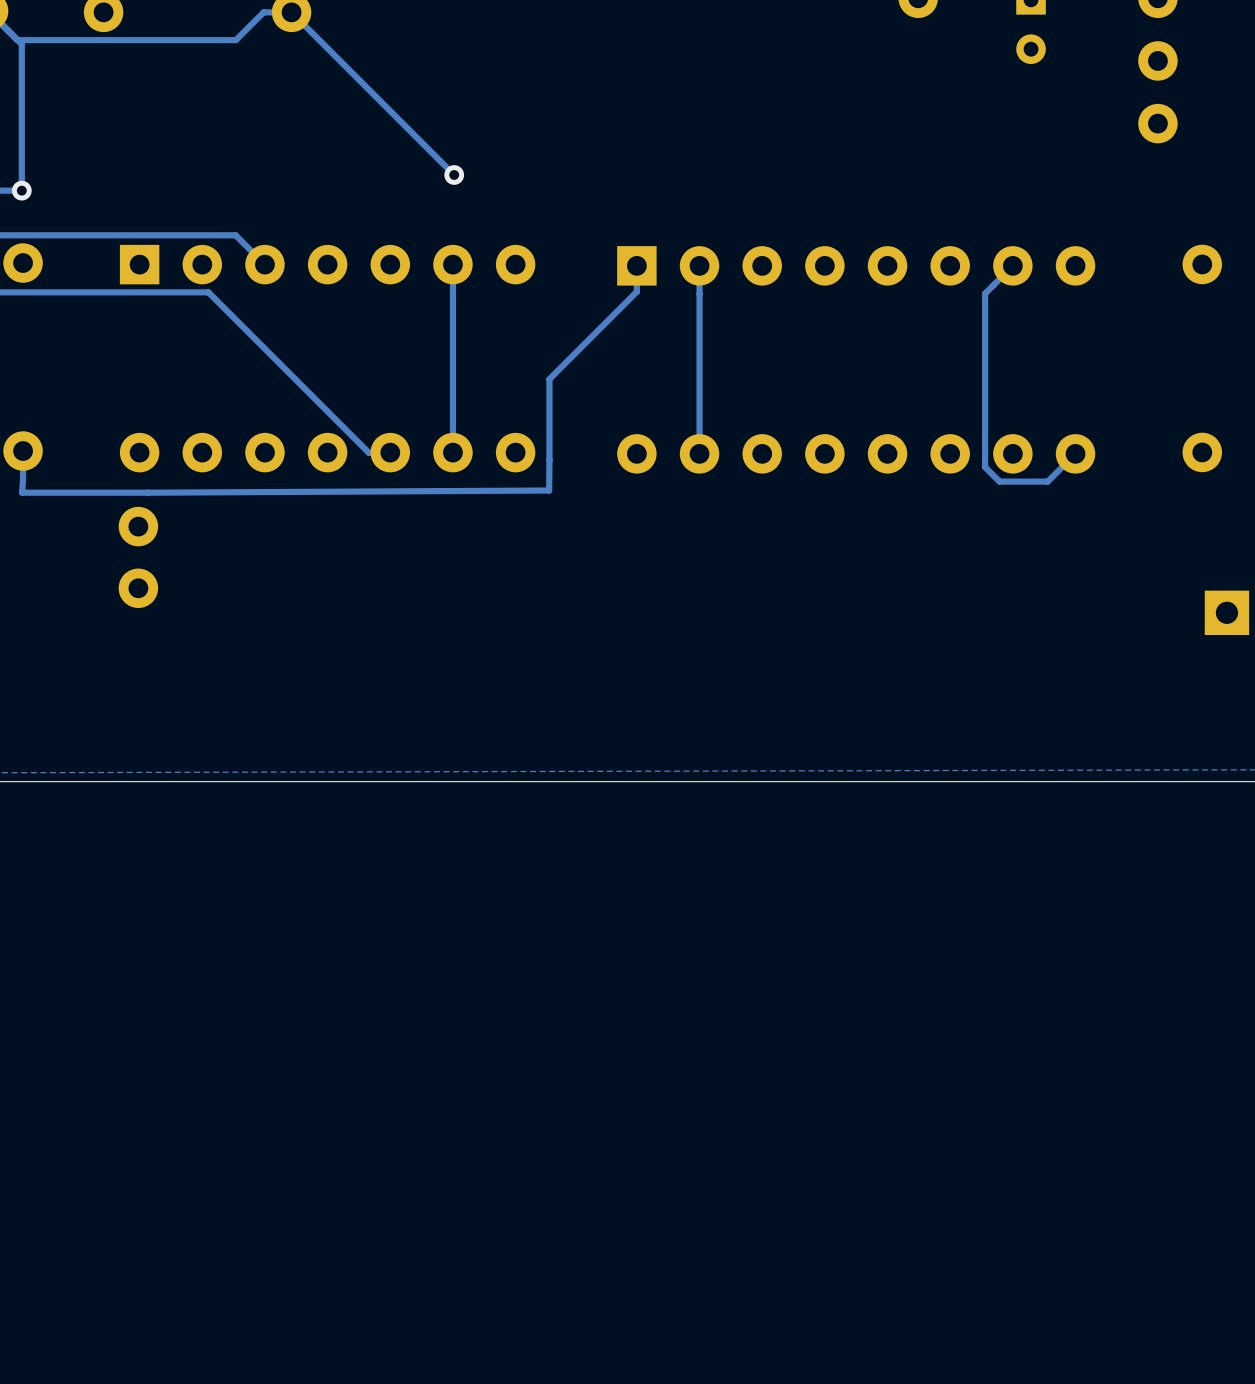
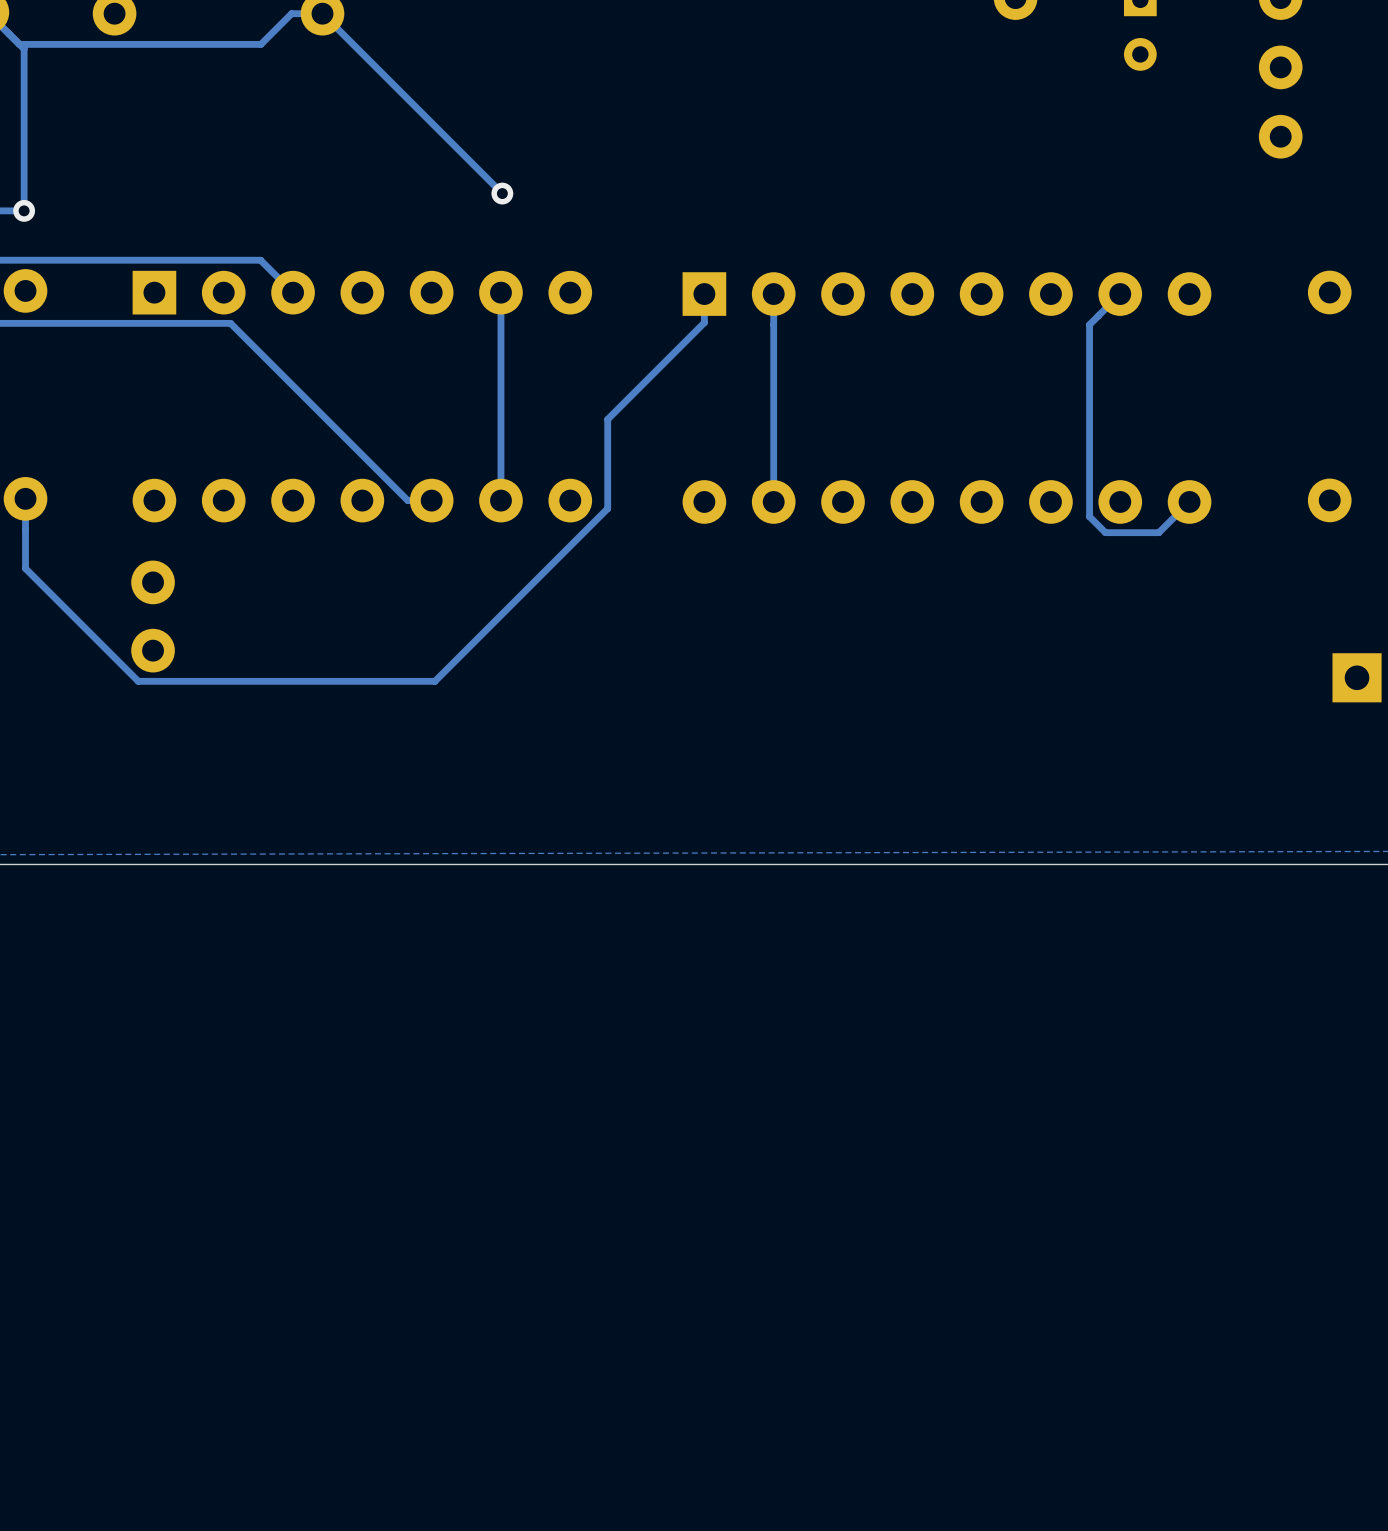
track: (549, 459) (549, 490) (22, 492) (23, 478) -> (607, 508) (434, 681) (138, 681) (25, 568) (25, 529)

